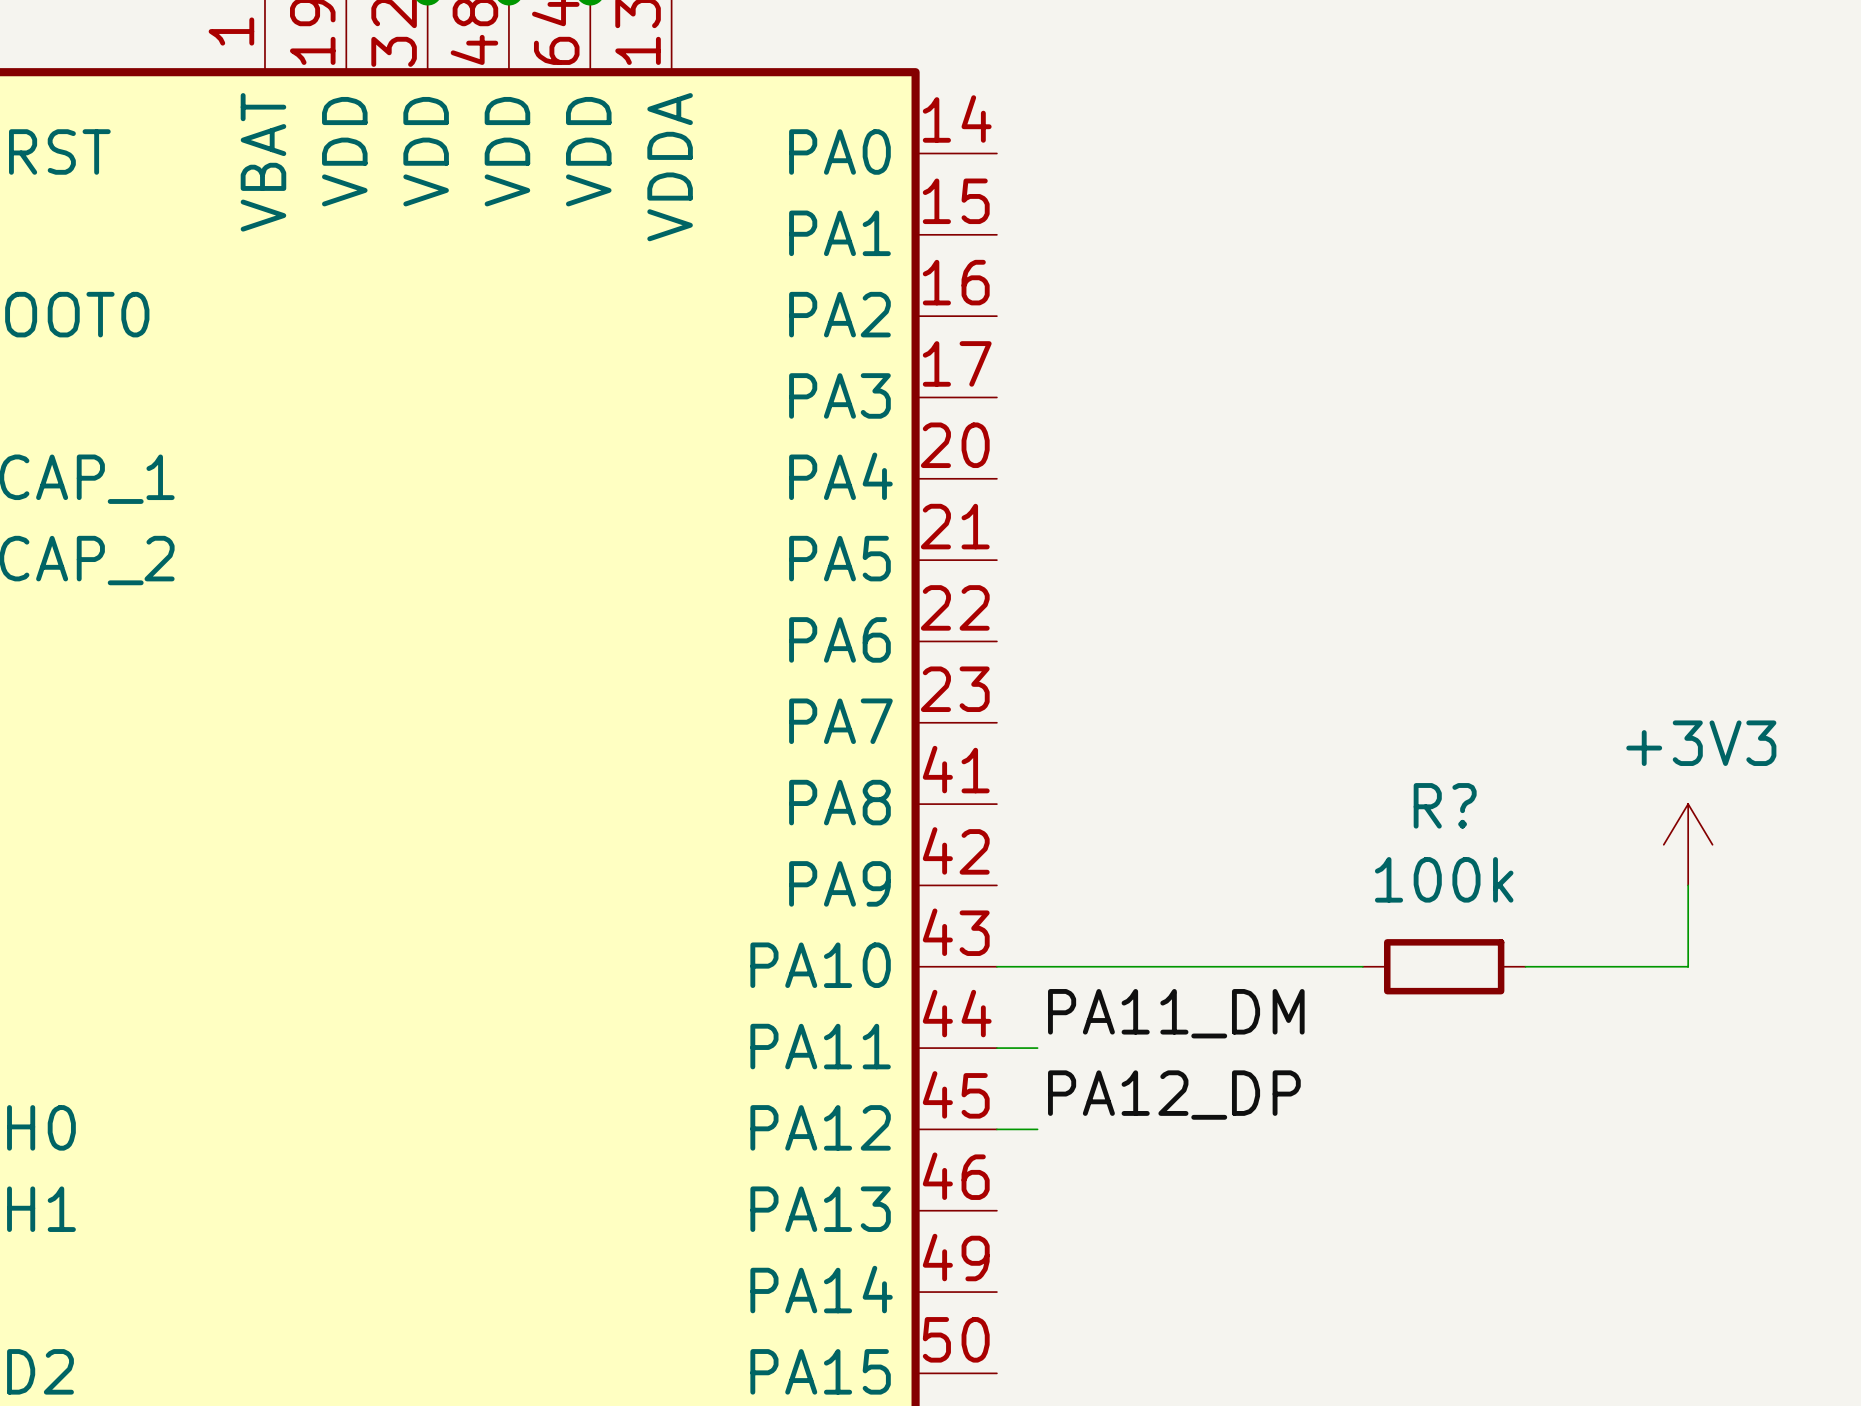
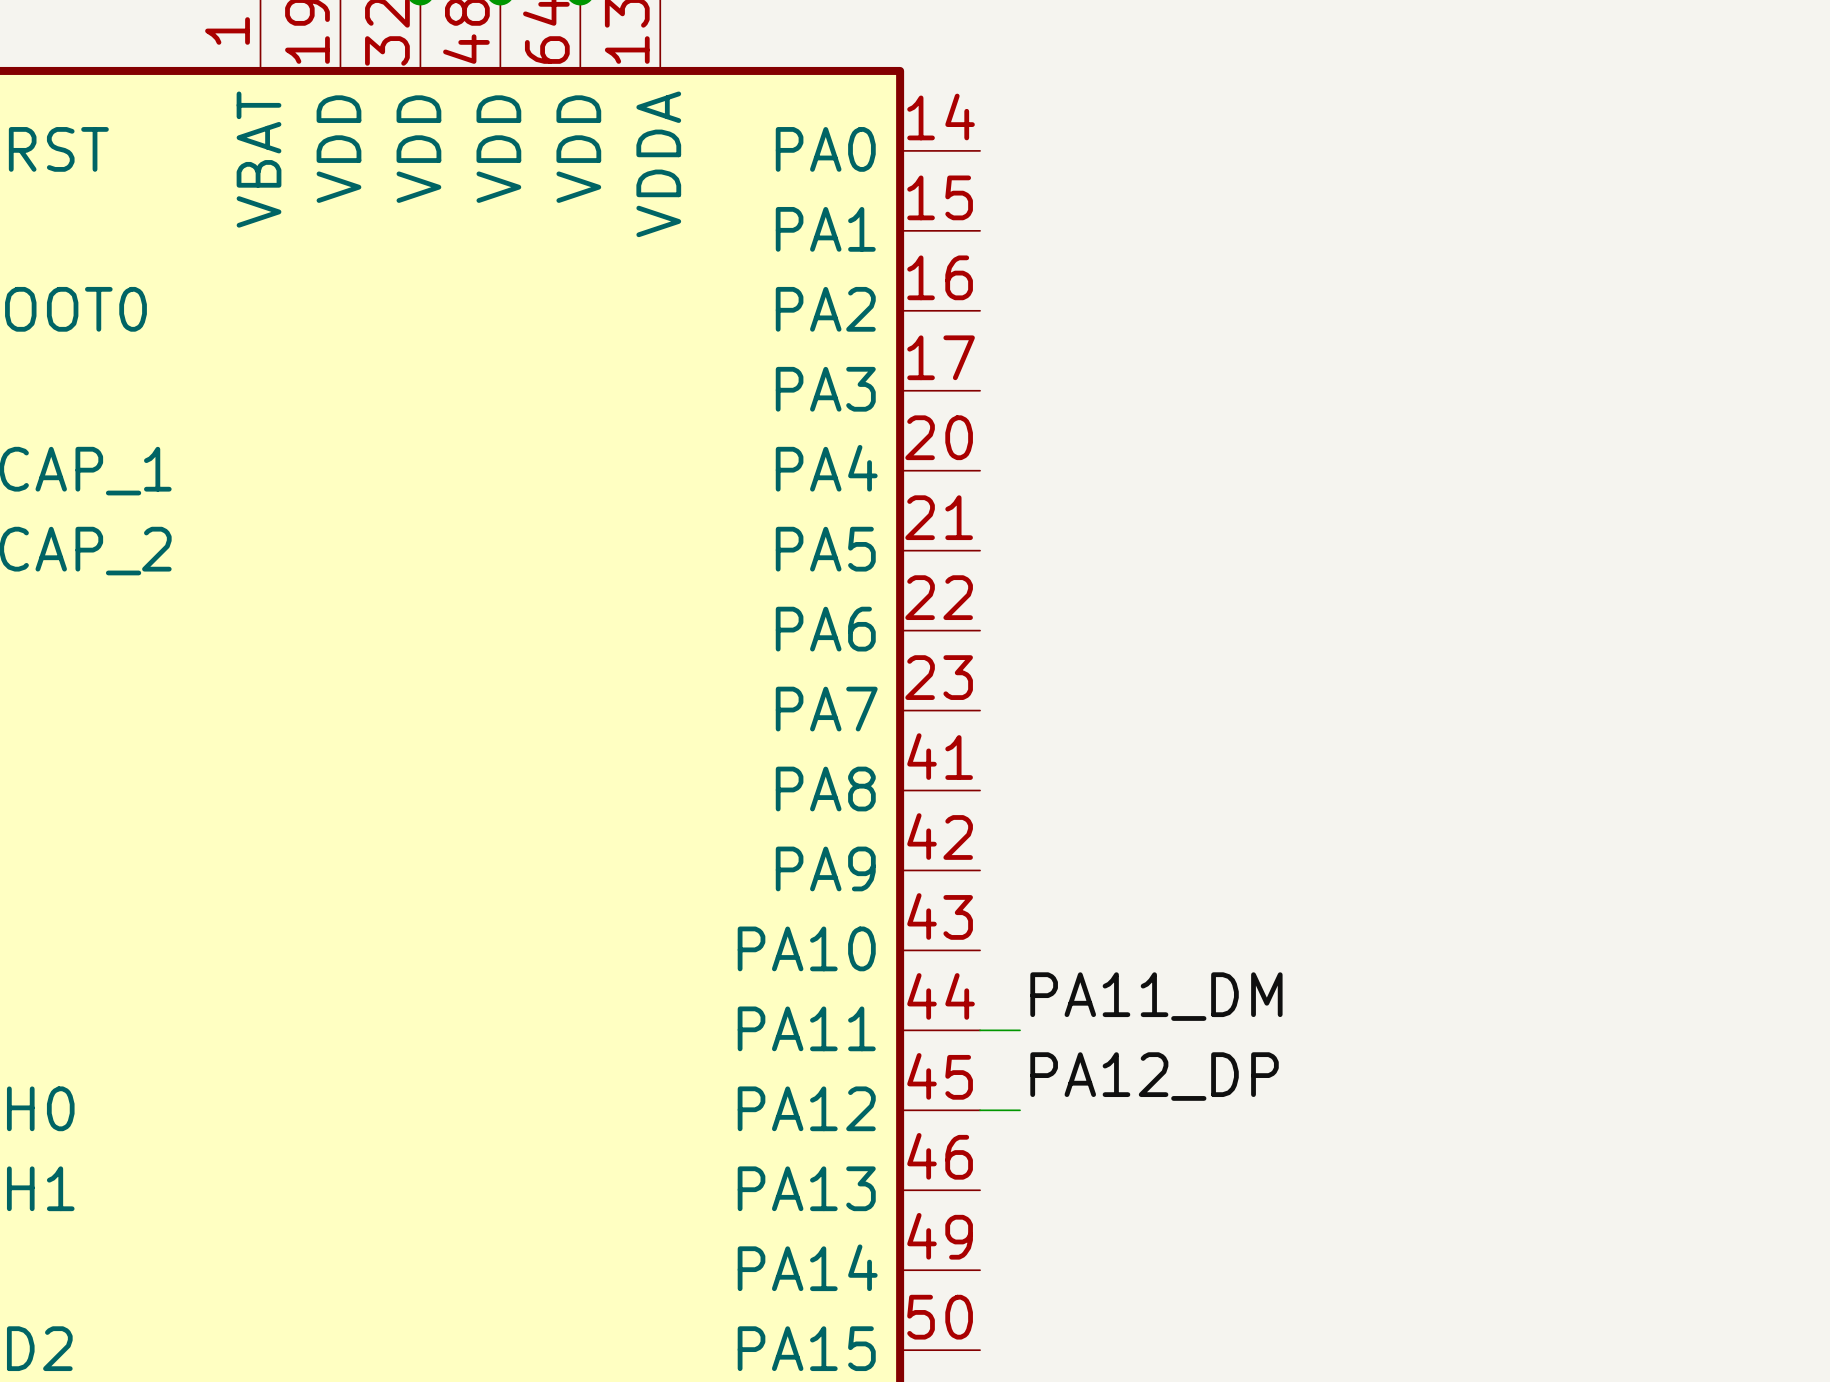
power symbol: +3V3 (1688, 844) -> none
wire: (1688, 885) (1688, 966) (1525, 966) -> none
wire: (996, 966) (1362, 966) -> none
R?: 100k (1444, 966) -> none

